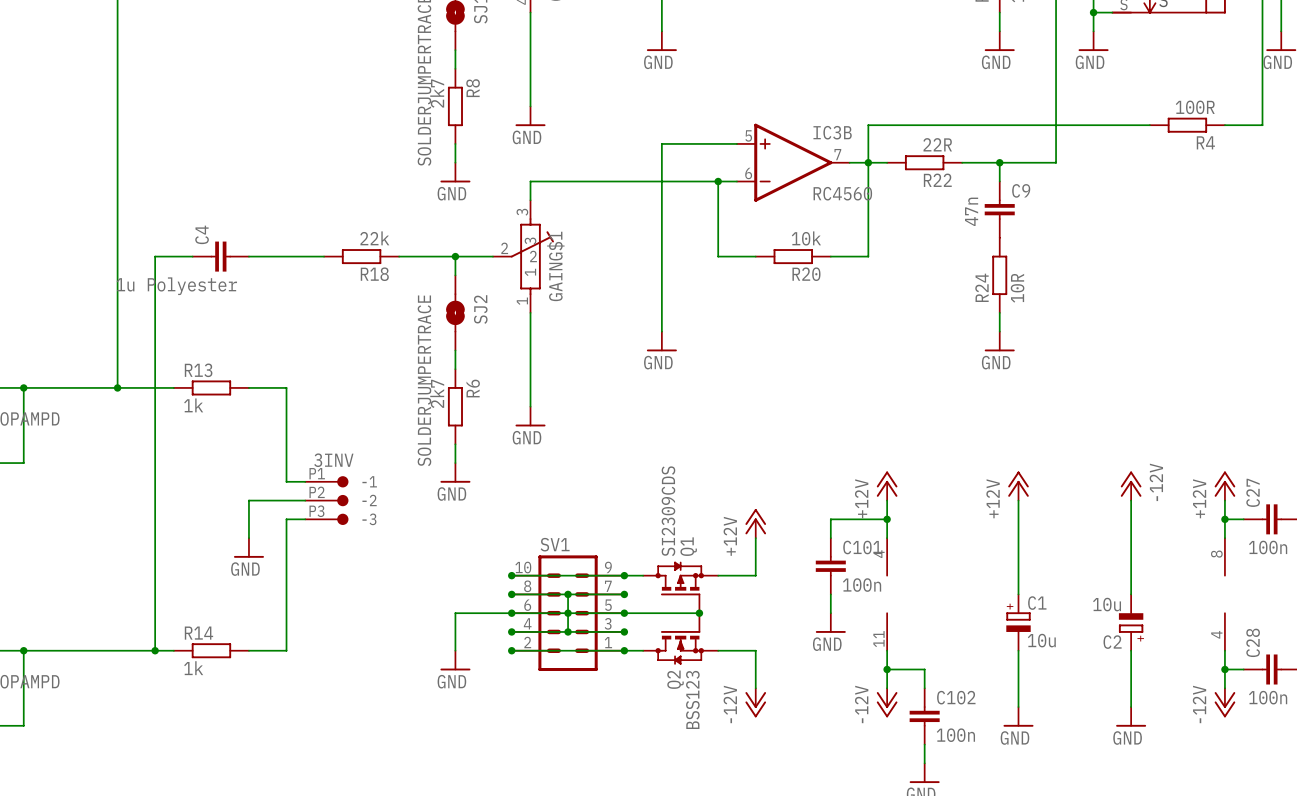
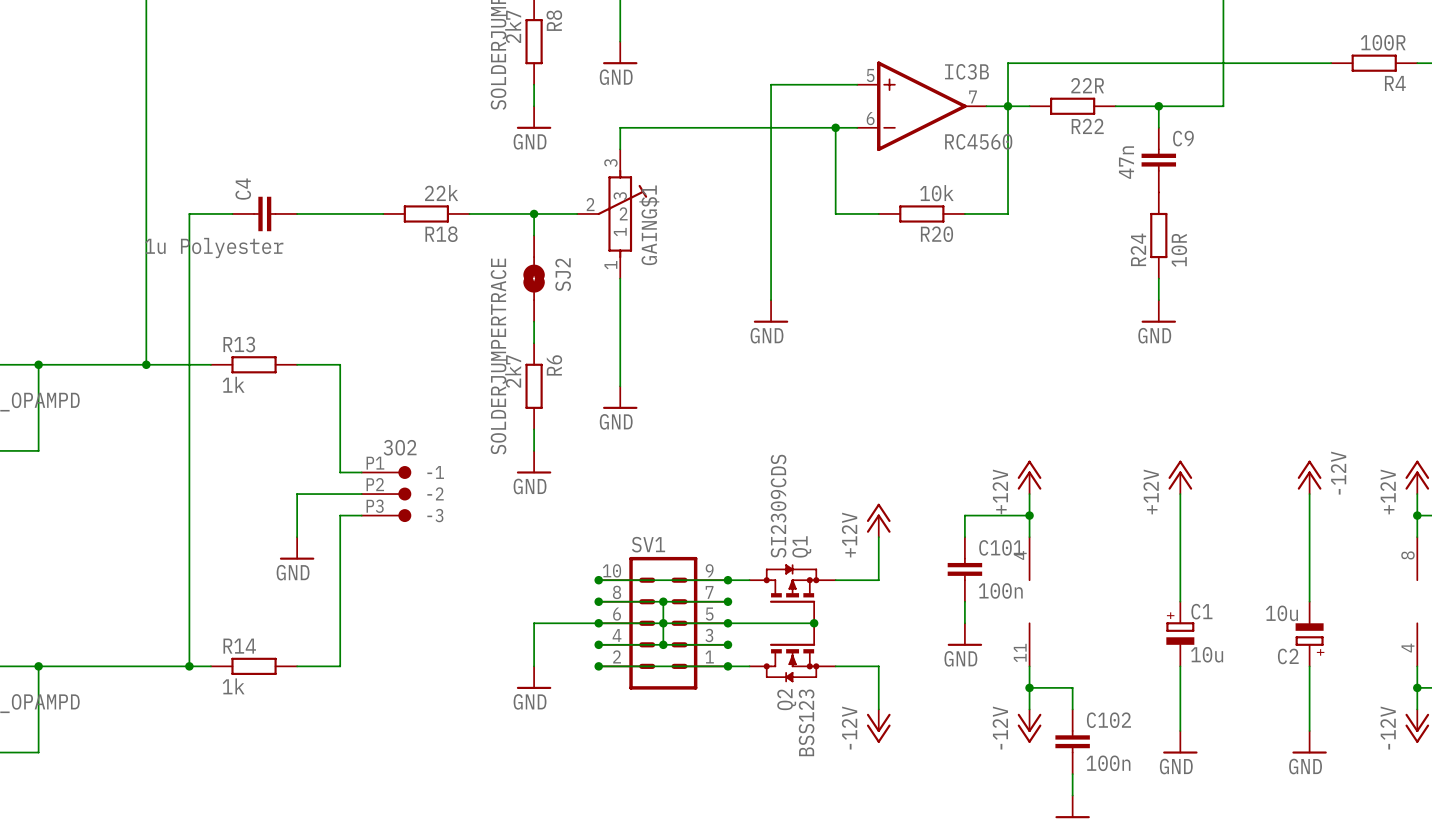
3INV name: 3INV (333, 460) -> 3O2 (400, 447)

